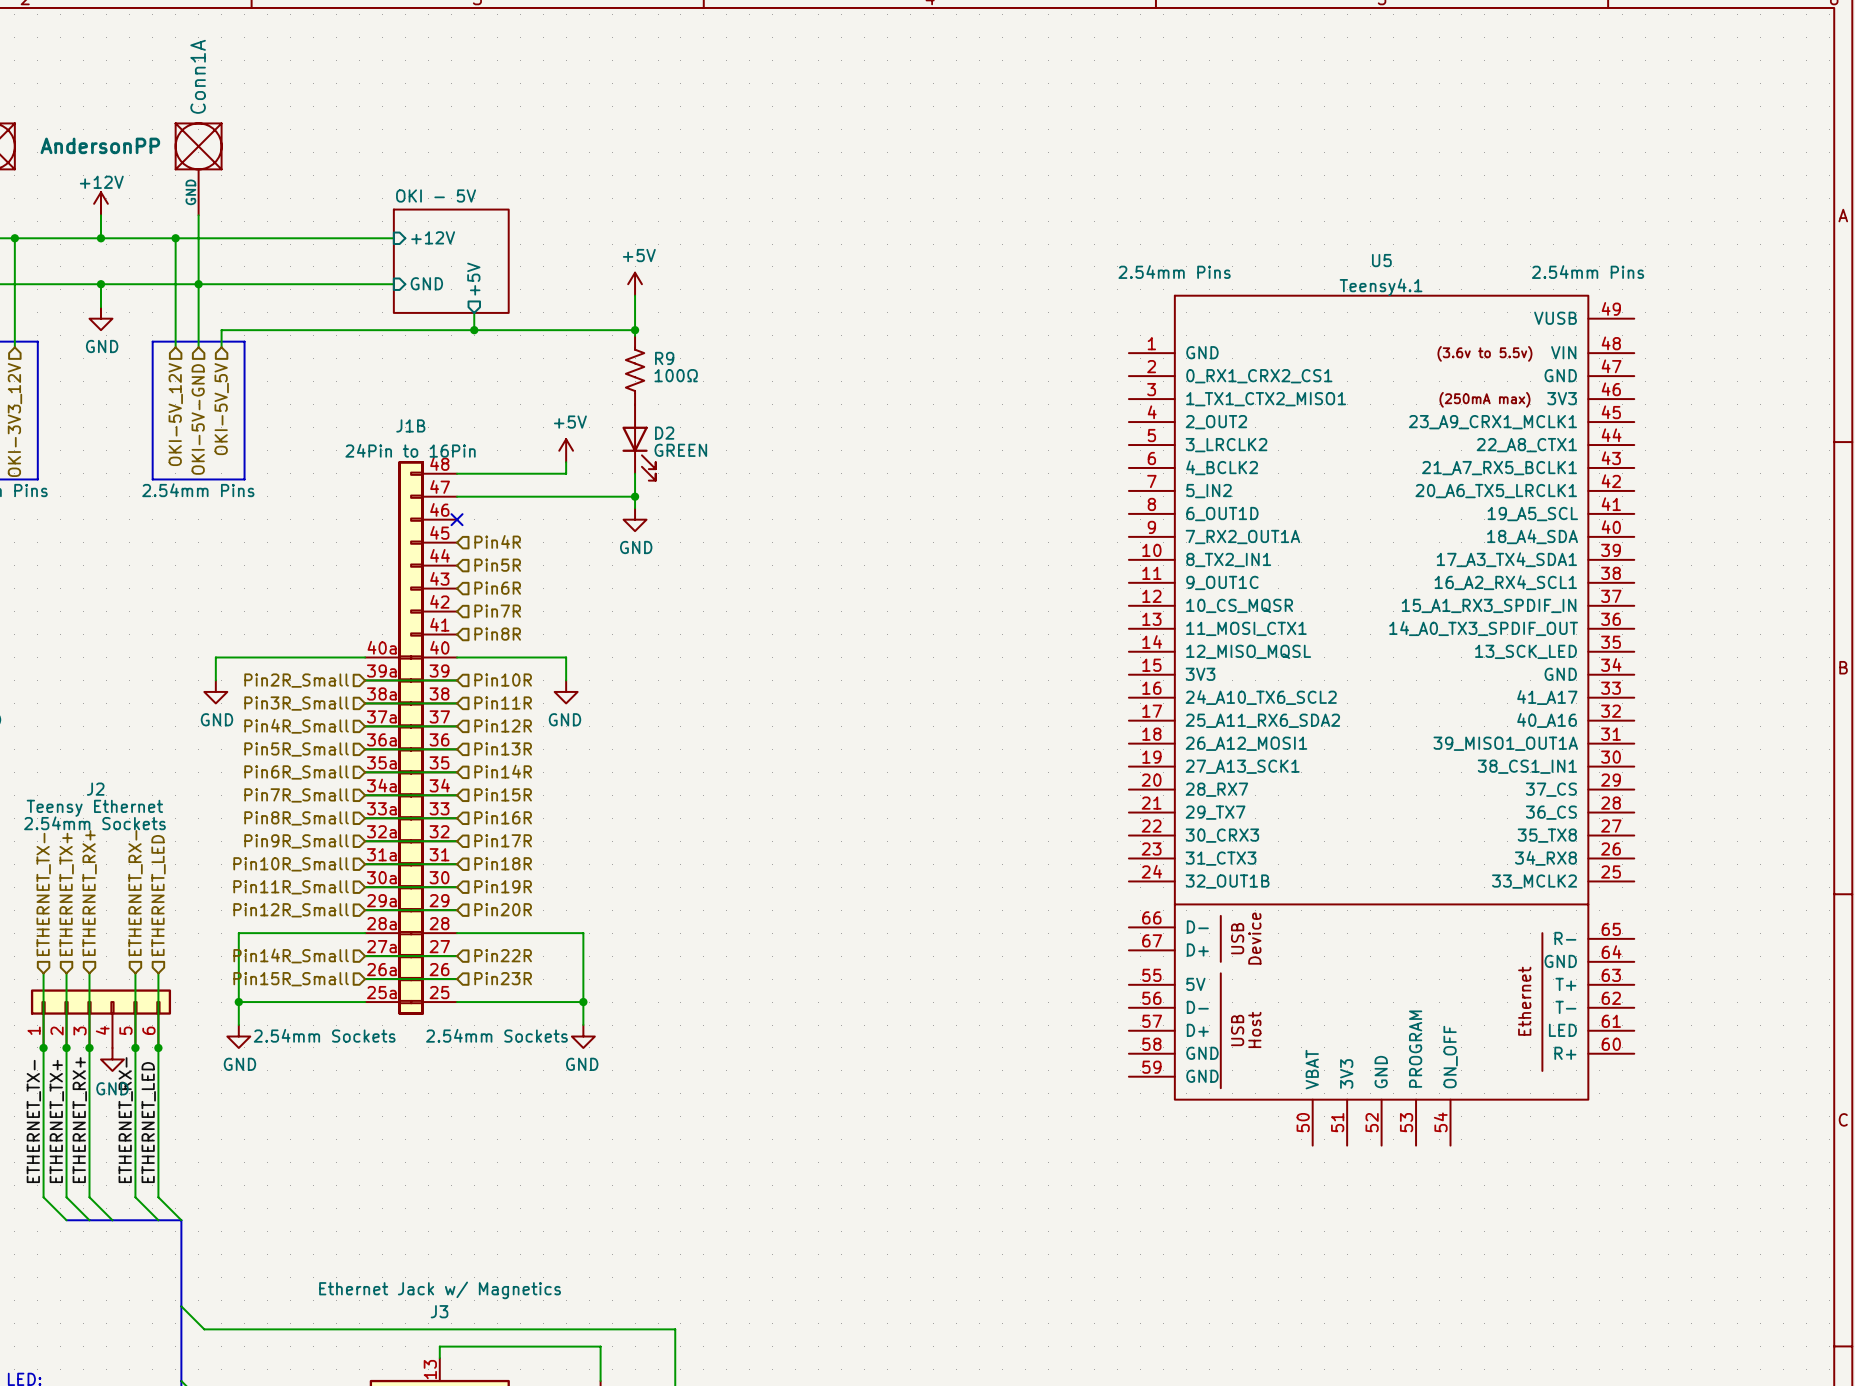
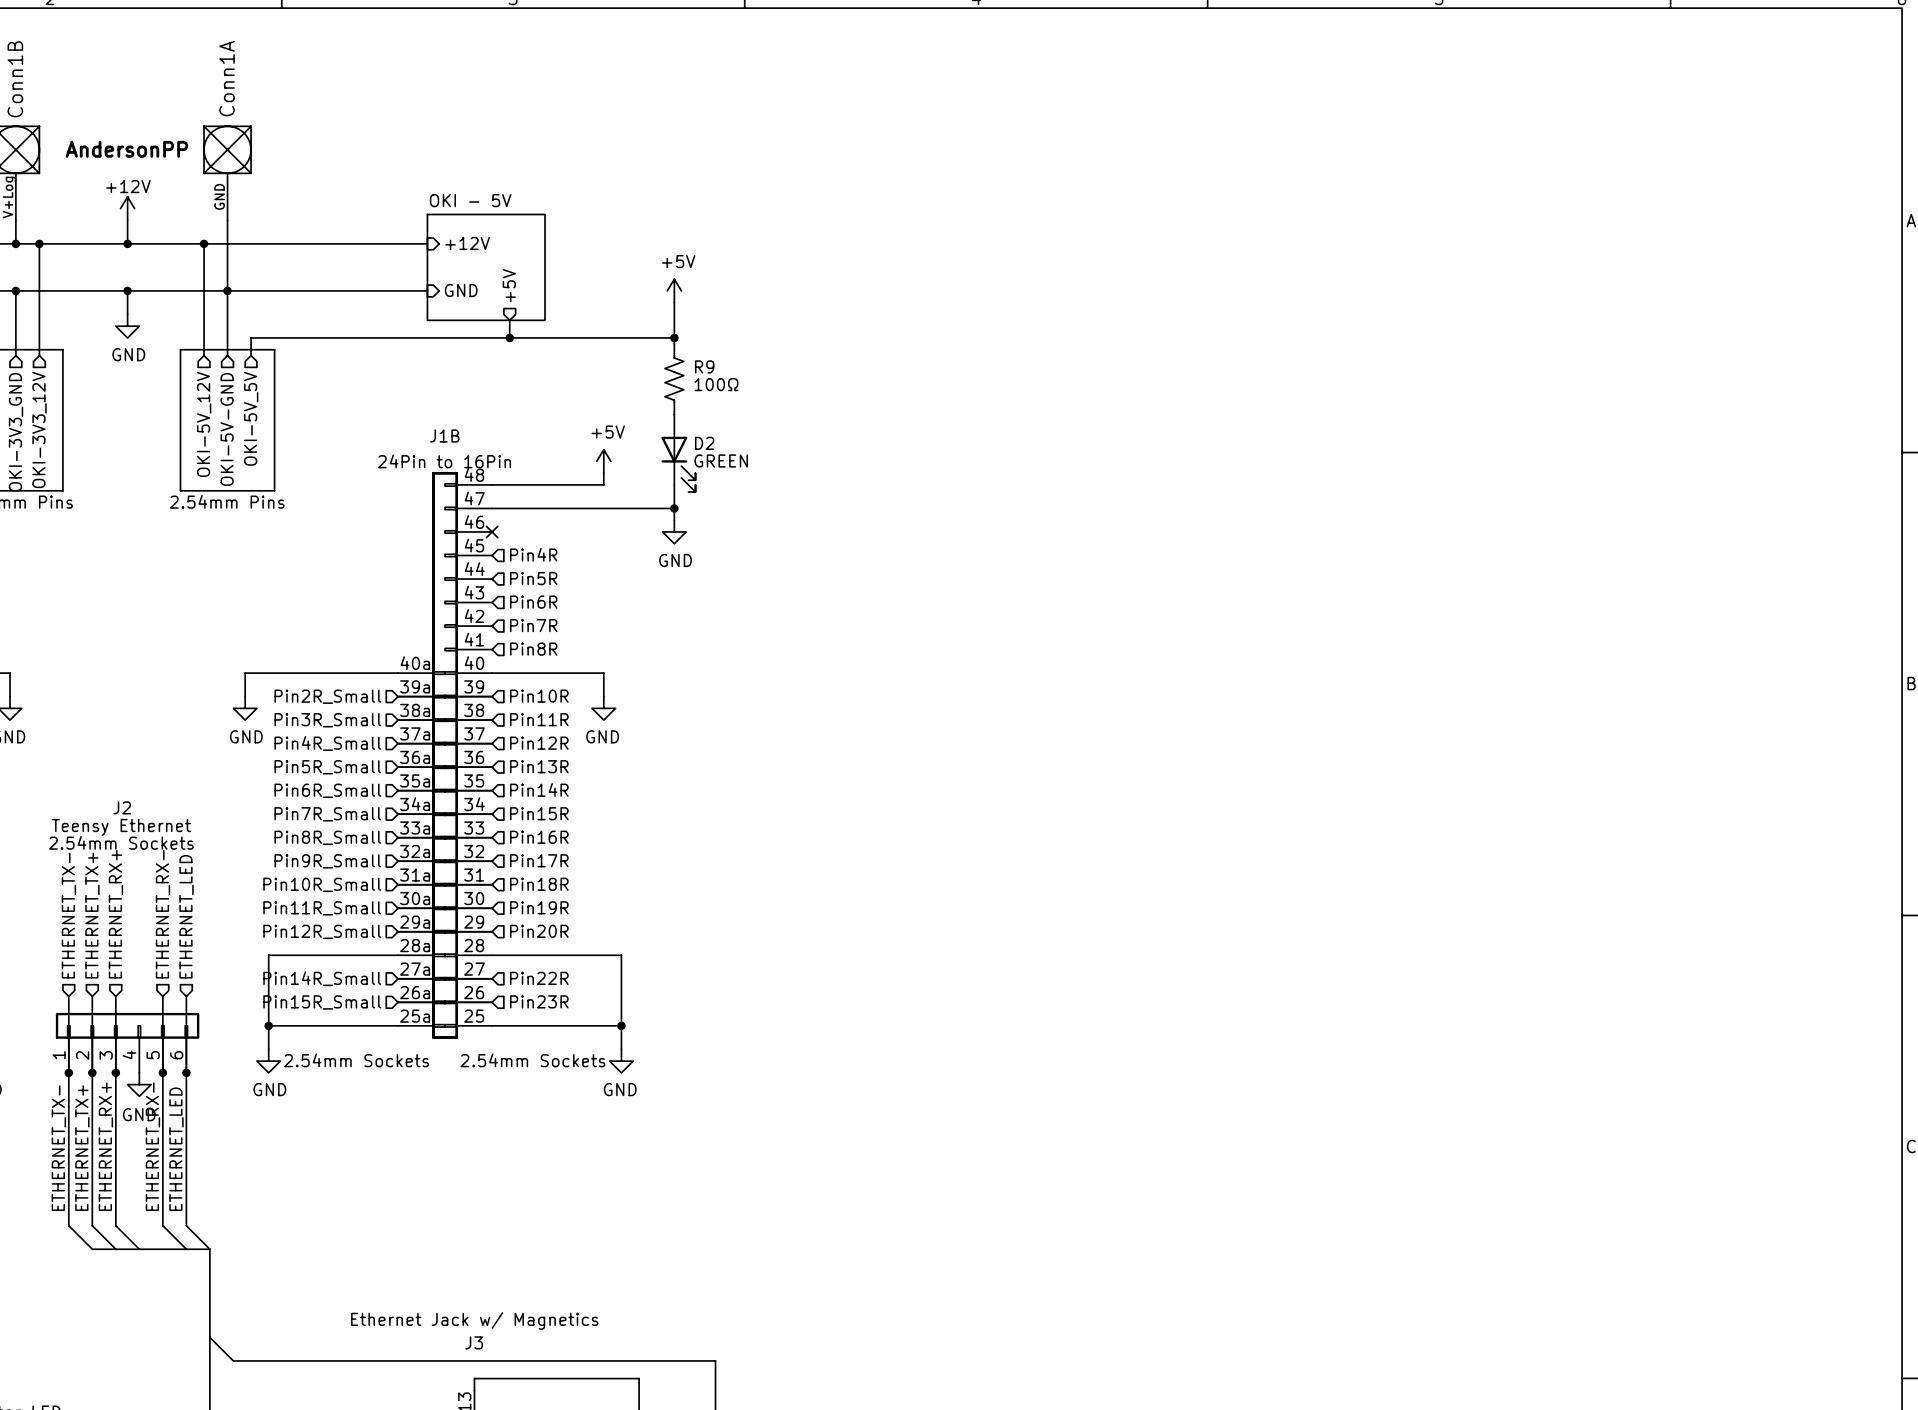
U5: Teensy4.1 (1381, 720) -> none

